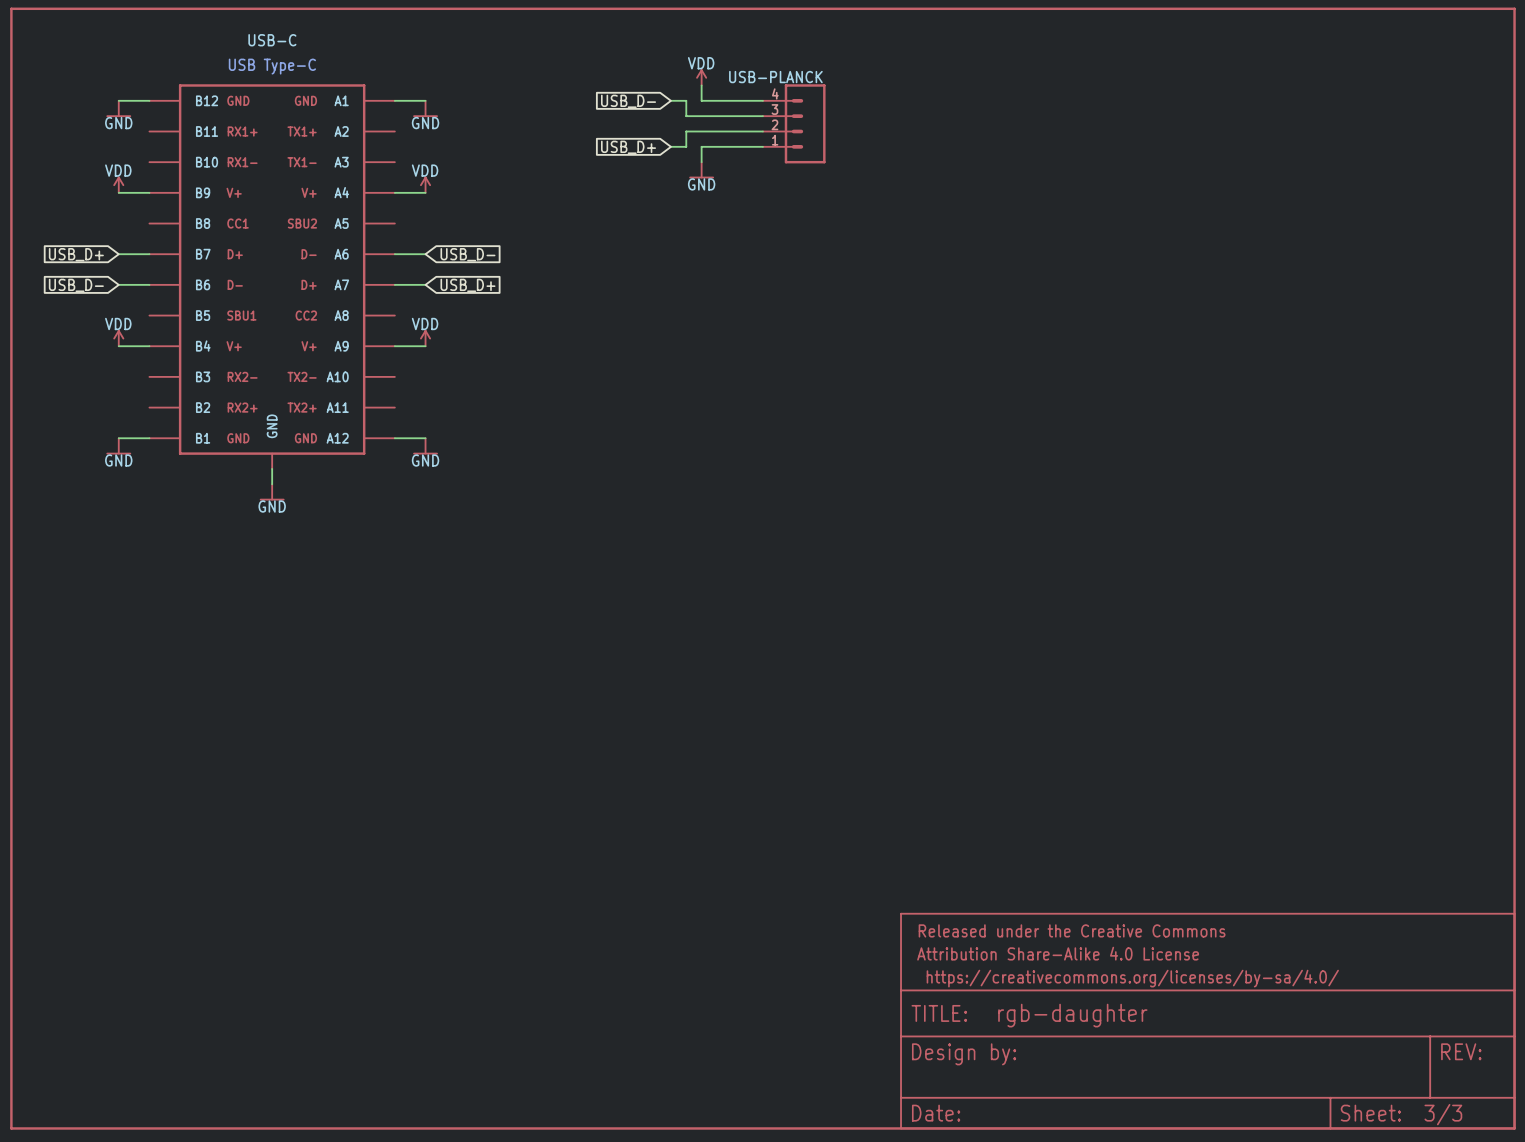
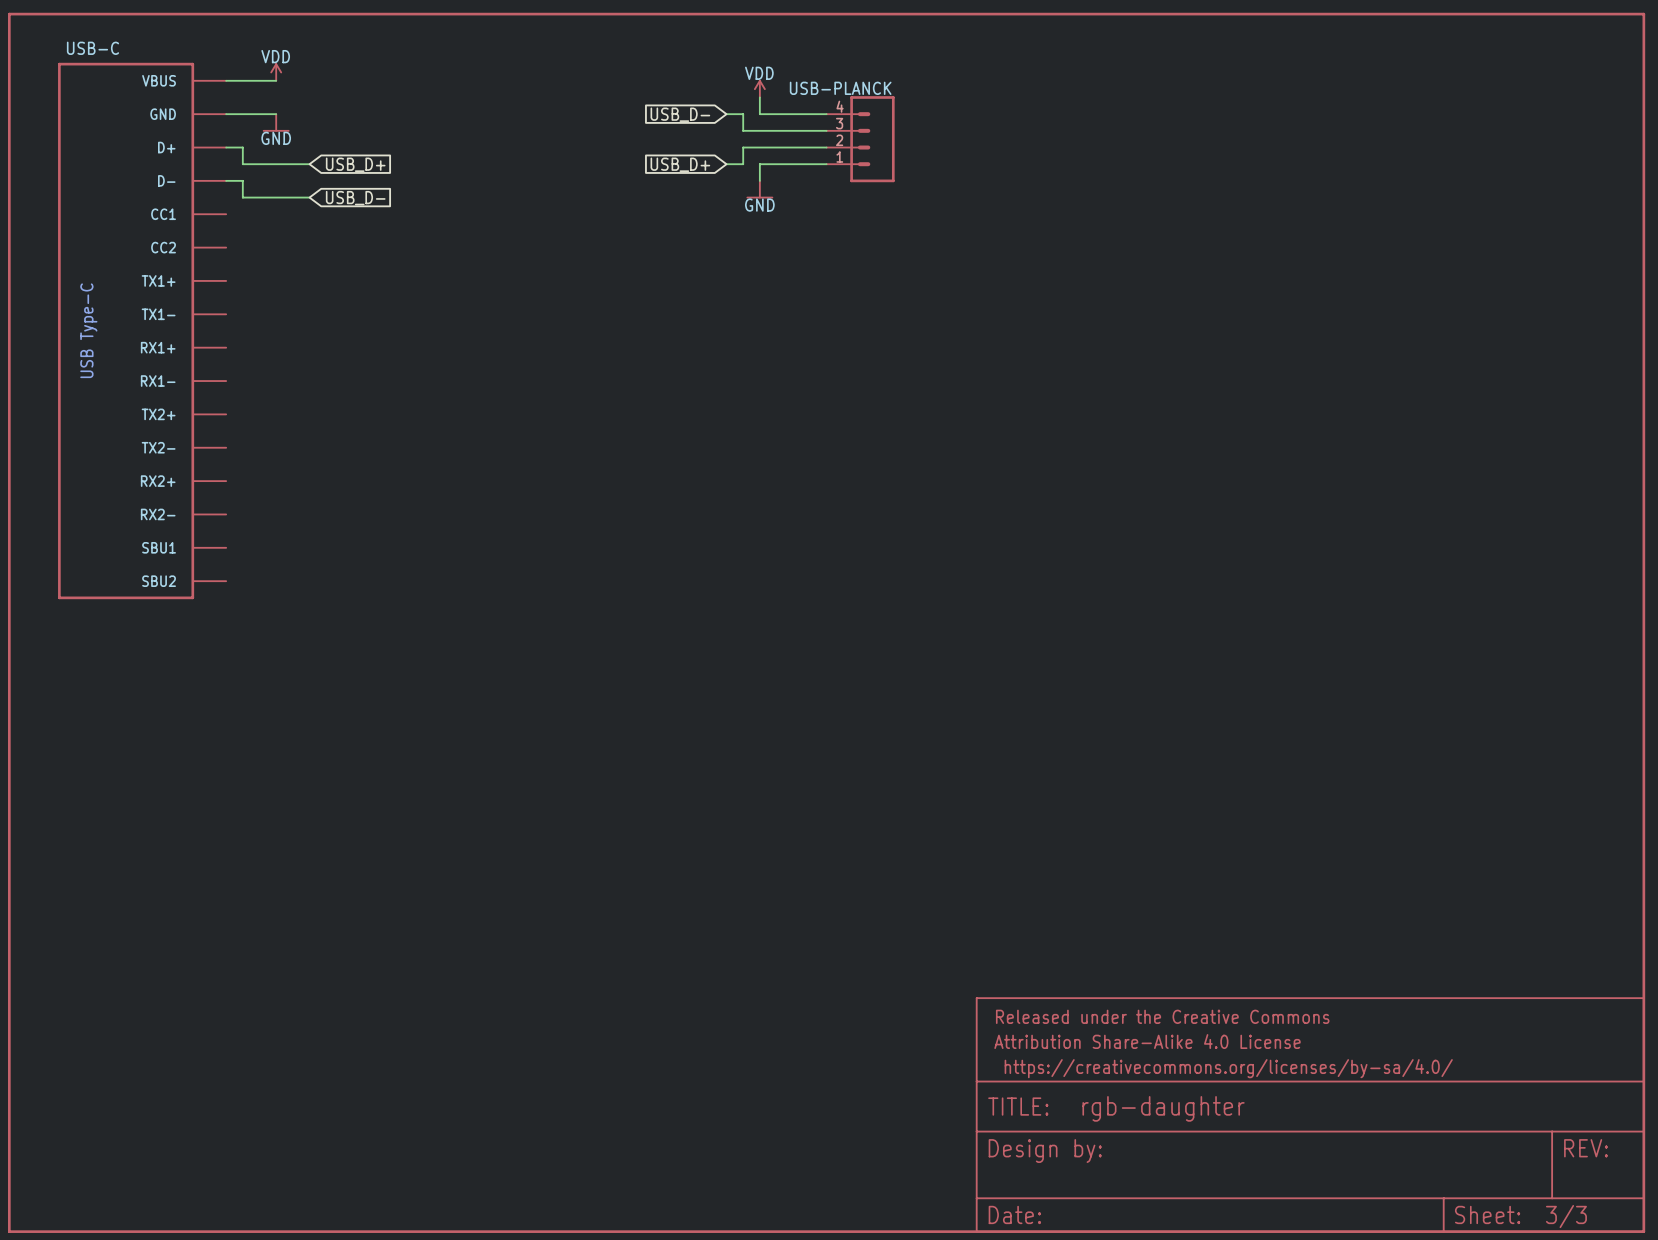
power symbol: none -> VDD (276, 72)
wire: none -> (226, 80) (276, 80)
wire: (118, 100) (149, 100) -> none
wire: none -> (226, 114) (276, 114)
wire: (394, 100) (425, 100) -> none
power symbol: GND (118, 108) -> none
power symbol: none -> GND (276, 122)
power symbol: GND (425, 108) -> none
wire: none -> (226, 147) (242, 147) (242, 164) (309, 164)
global label: none -> USB_D+ (355, 164)
wire: none -> (226, 180) (242, 180) (242, 197) (309, 197)
global label: none -> USB_D- (355, 198)
power symbol: VDD (118, 184) -> none
power symbol: VDD (425, 184) -> none
wire: (118, 192) (149, 192) -> none
wire: (394, 192) (425, 192) -> none
global label: USB_D+ (76, 254) -> none
wire: (118, 254) (149, 254) -> none
wire: (394, 254) (425, 254) -> none
global label: USB_D- (467, 254) -> none
USB-C: (272, 276) -> none
wire: (118, 284) (149, 284) -> none
wire: (394, 284) (425, 284) -> none
global label: USB_D- (76, 285) -> none
global label: USB_D+ (467, 285) -> none
USB-C: none -> (142, 330)
power symbol: VDD (118, 338) -> none
power symbol: VDD (425, 338) -> none
wire: (118, 346) (149, 346) -> none
wire: (394, 346) (425, 346) -> none
wire: (118, 438) (149, 438) -> none
wire: (394, 438) (425, 438) -> none
power symbol: GND (118, 446) -> none
power symbol: GND (425, 446) -> none
wire: (272, 468) (272, 484) -> none
power symbol: GND (272, 492) -> none

